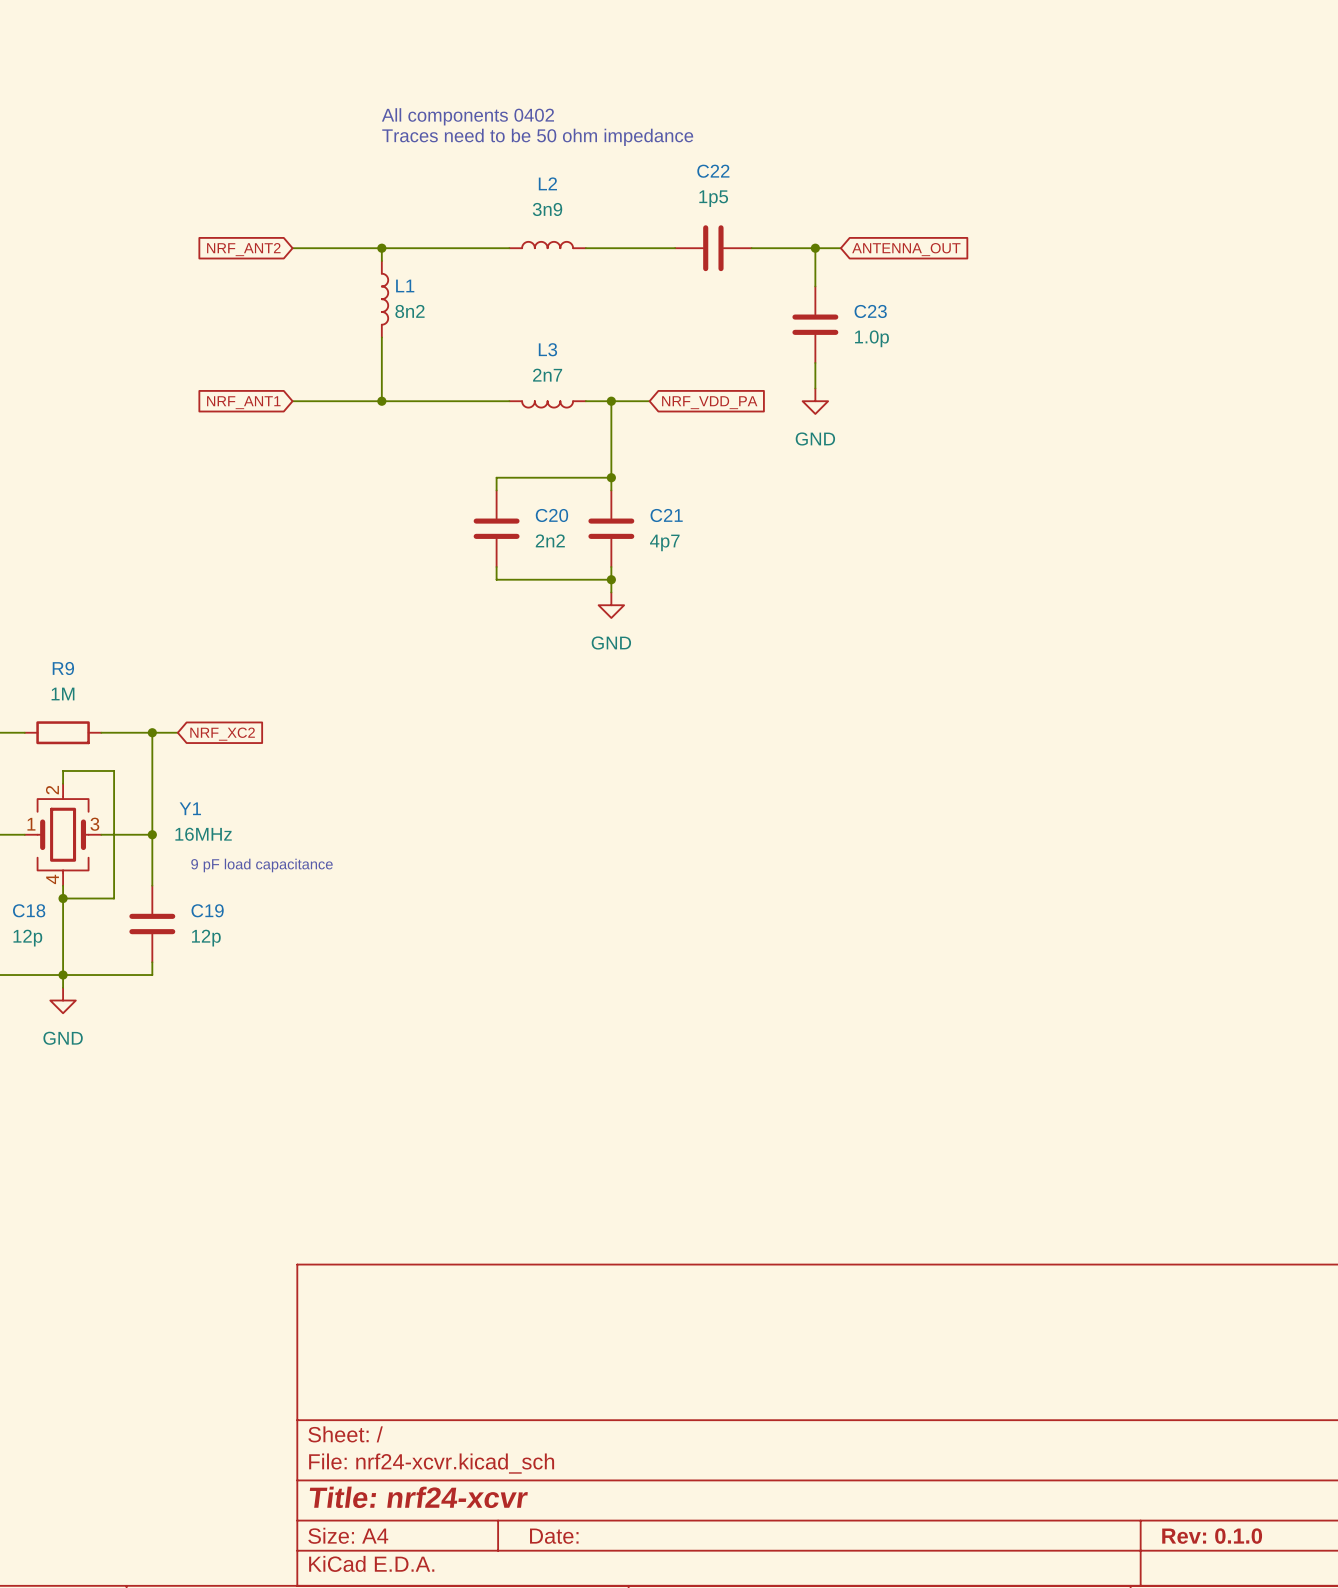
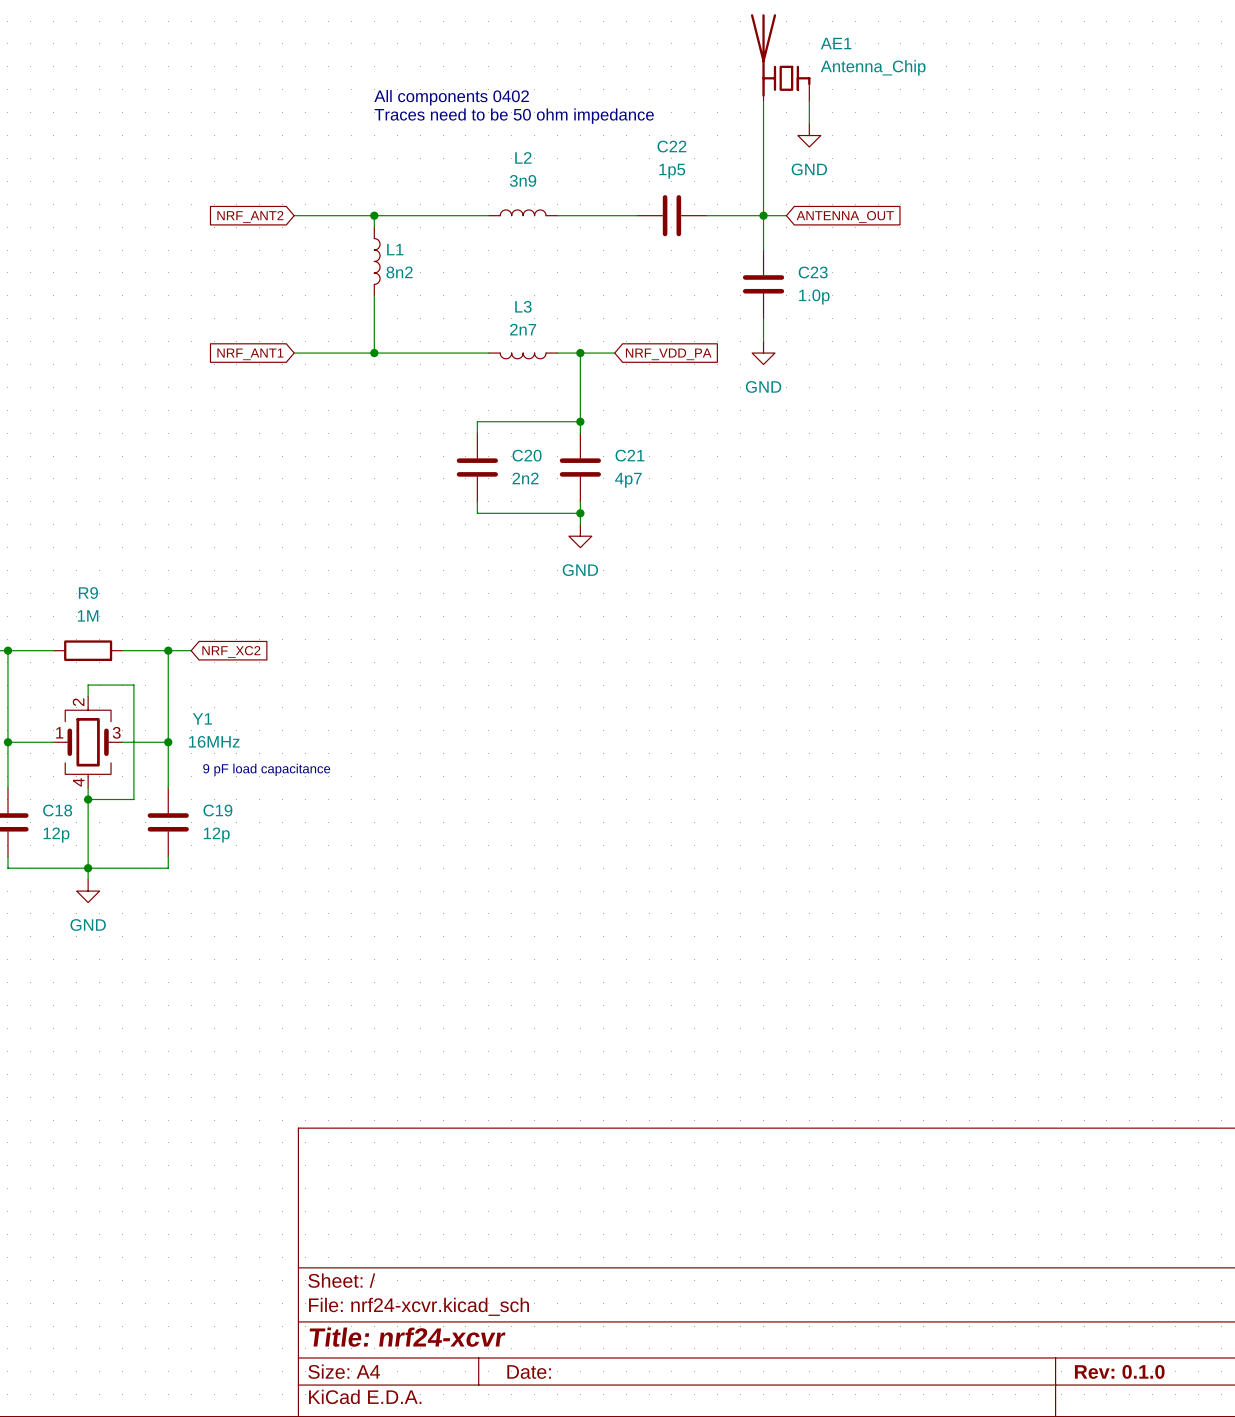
AE1: none -> Antenna_Chip (780, 57)
wire: none -> (763, 101) (763, 215)
wire: none -> (809, 101) (809, 124)
power symbol: none -> GND (809, 135)

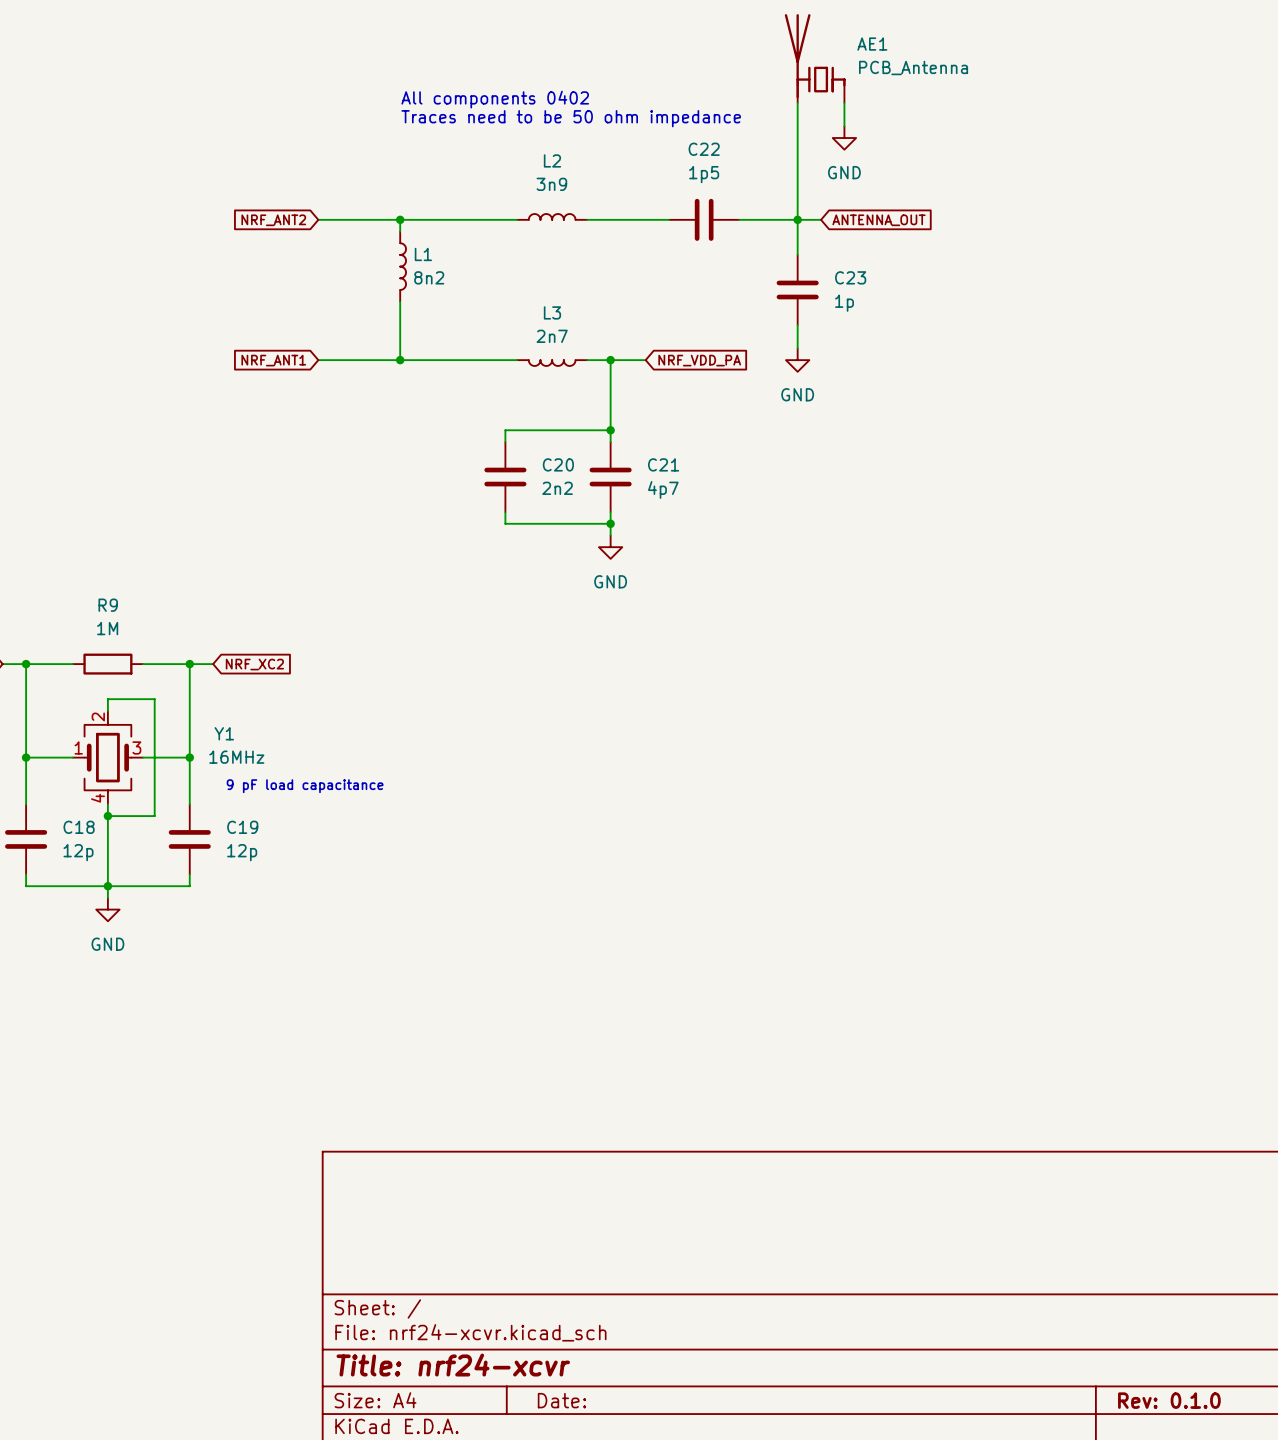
AE1 value: Antenna_Chip (873, 67) -> PCB_Antenna (913, 67)
C23 value: 1.0p (814, 297) -> 1p (844, 303)

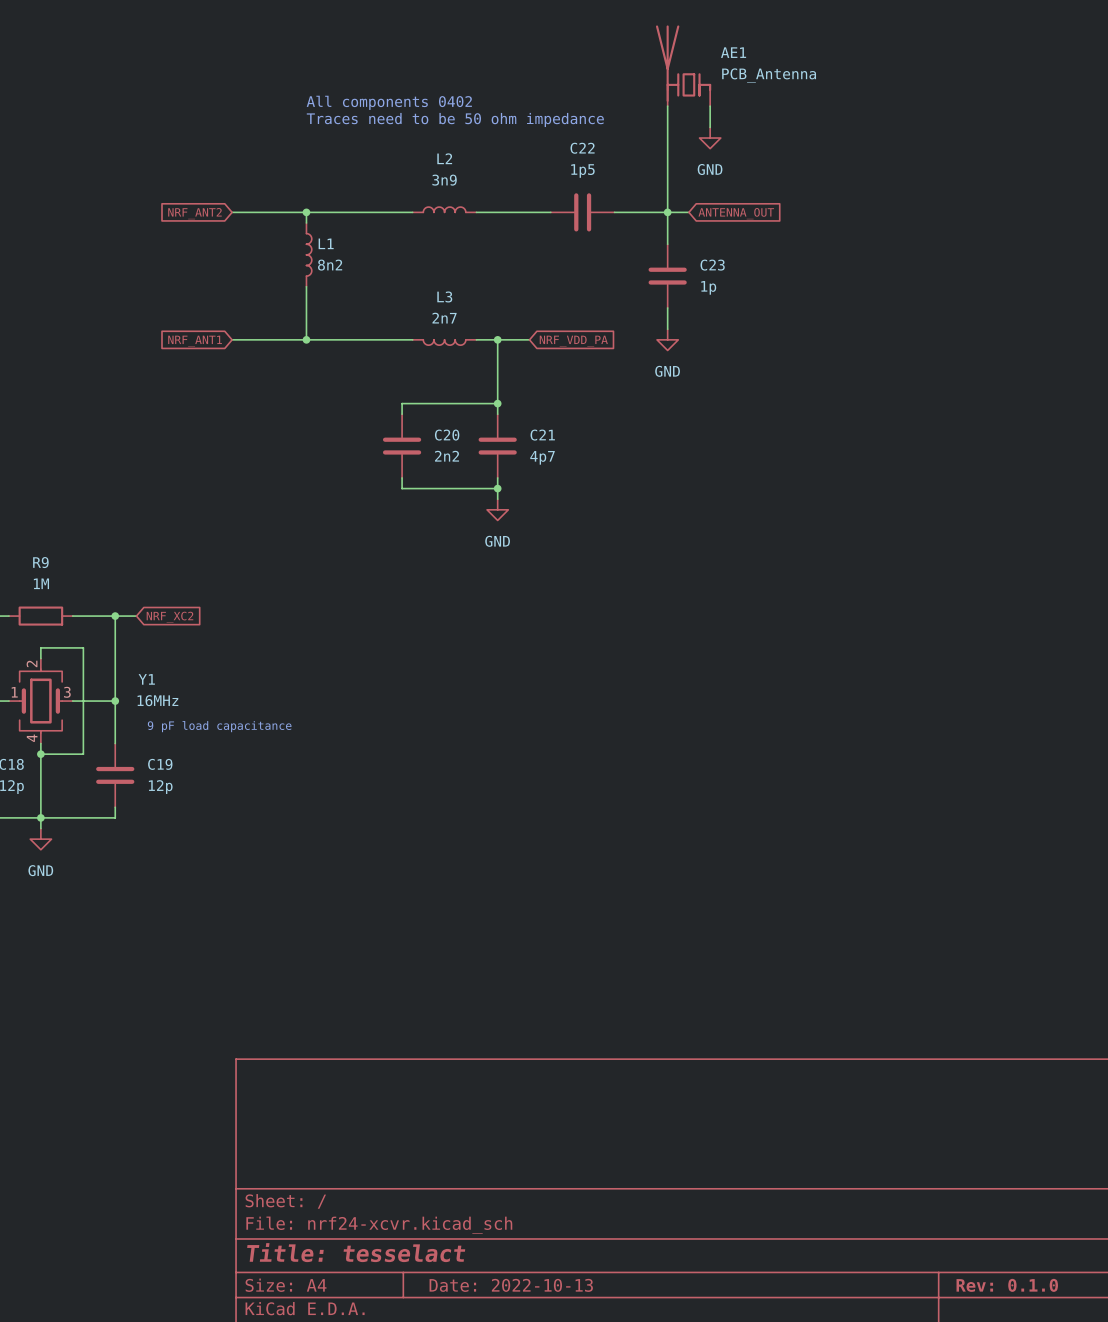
title block: Title: nrf24-xcvr (453, 1365) -> Title: tesselact (356, 1252)
title block: Date: (561, 1400) -> Date: 2022-10-13 (511, 1285)

